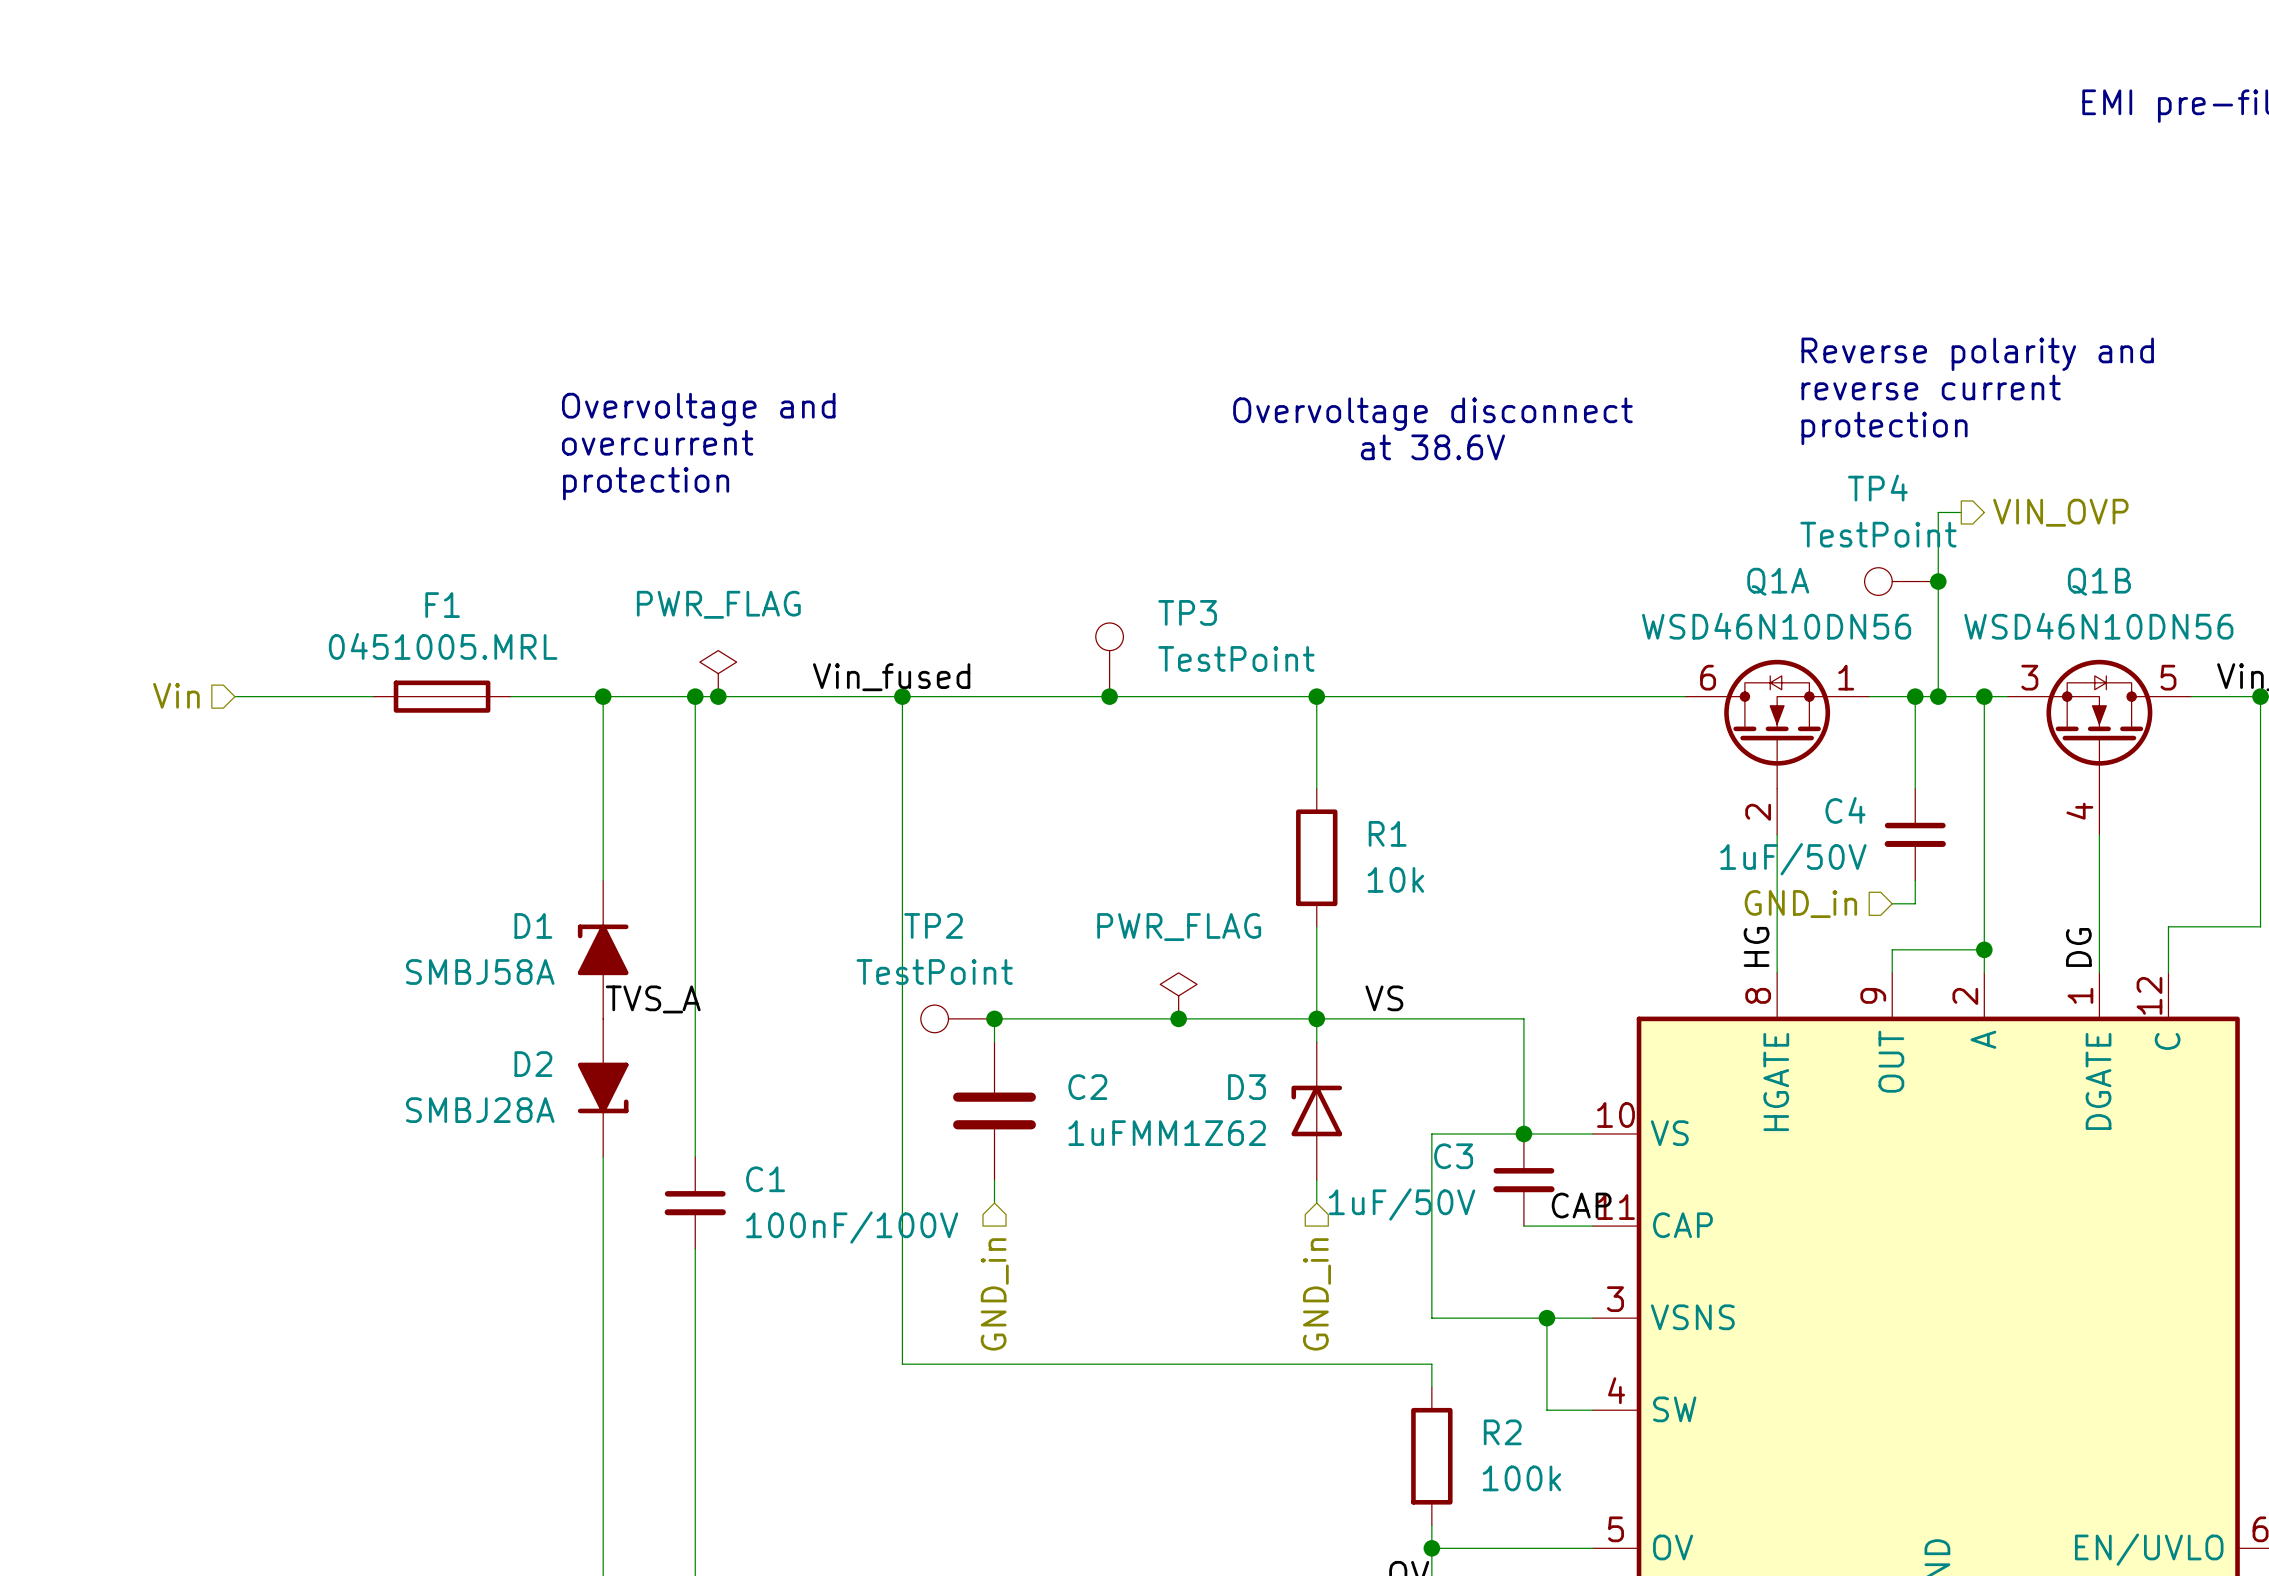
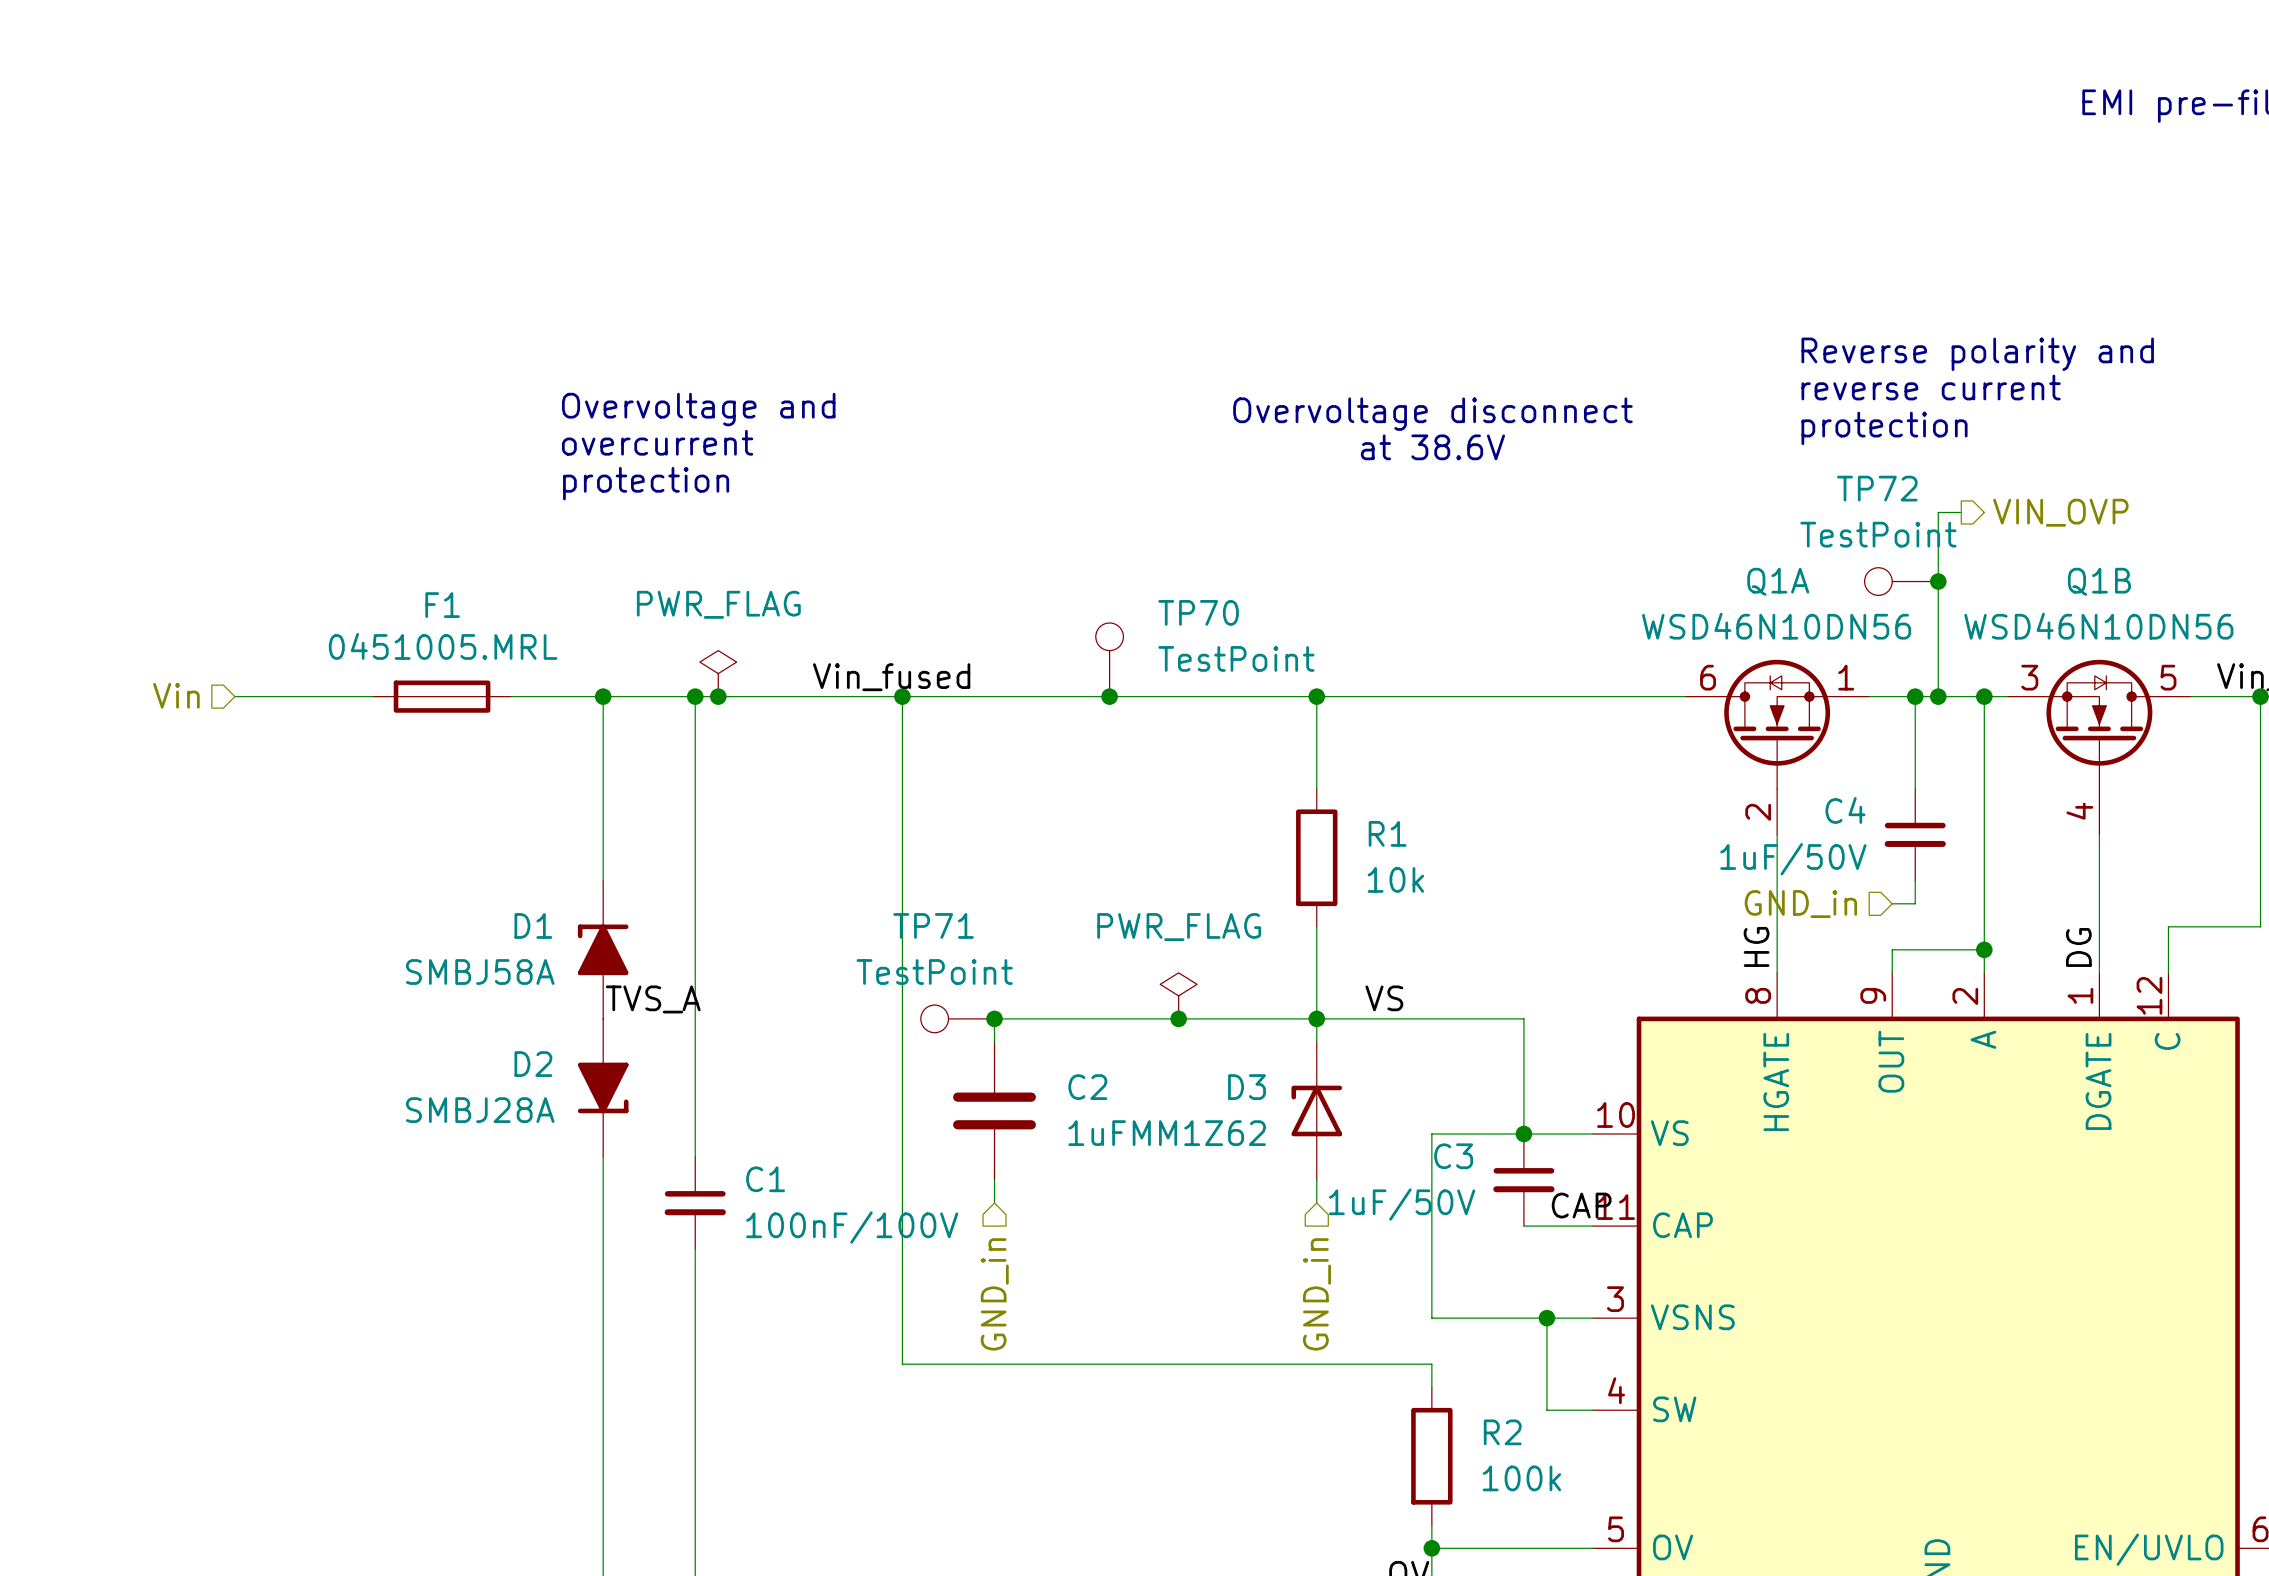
TP4 name: TP4 (1877, 488) -> TP72 (1877, 488)
TP3 name: TP3 (1187, 612) -> TP70 (1198, 612)
TP2 name: TP2 (933, 925) -> TP71 (933, 925)

